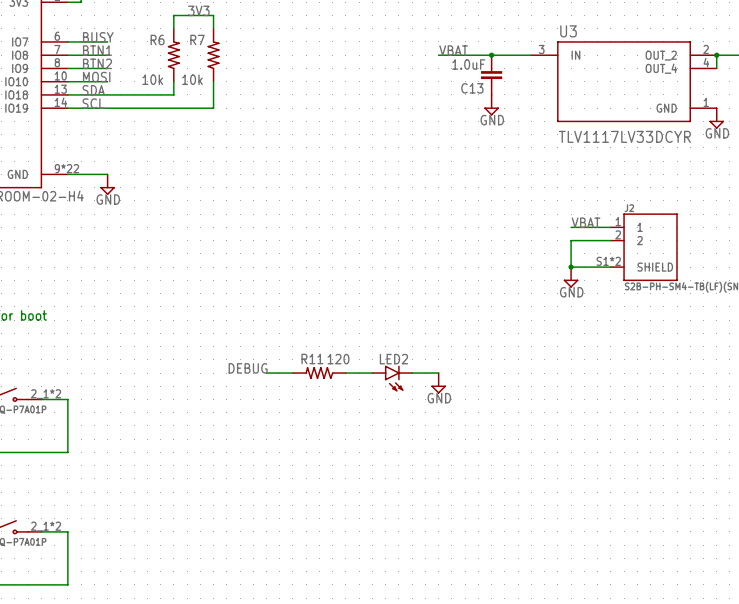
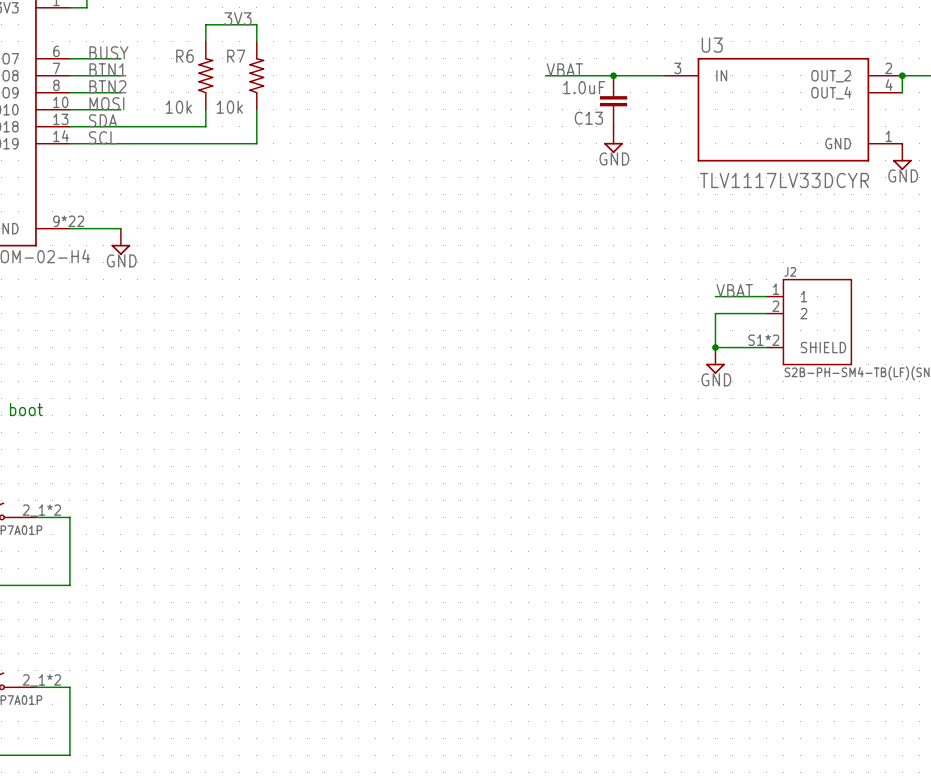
label: DEBUG (248, 368) -> none
wire: (266, 373) (292, 373) -> none
R11: 120 (319, 373) -> none
wire: (345, 373) (372, 373) -> none
wire: (412, 373) (438, 373) -> none
LED2: (392, 378) -> none
power symbol: GND (438, 383) -> none

